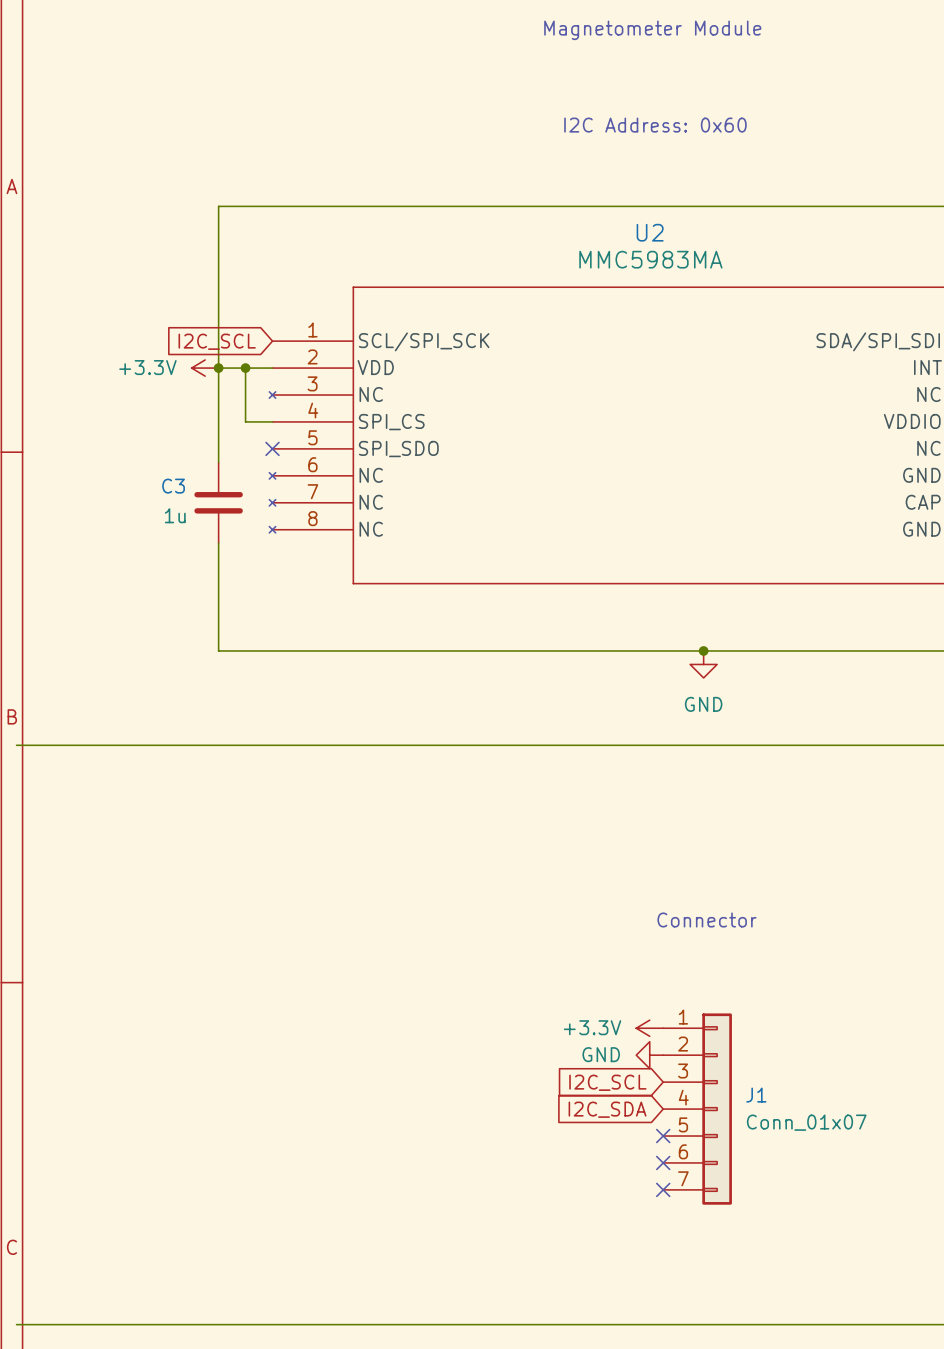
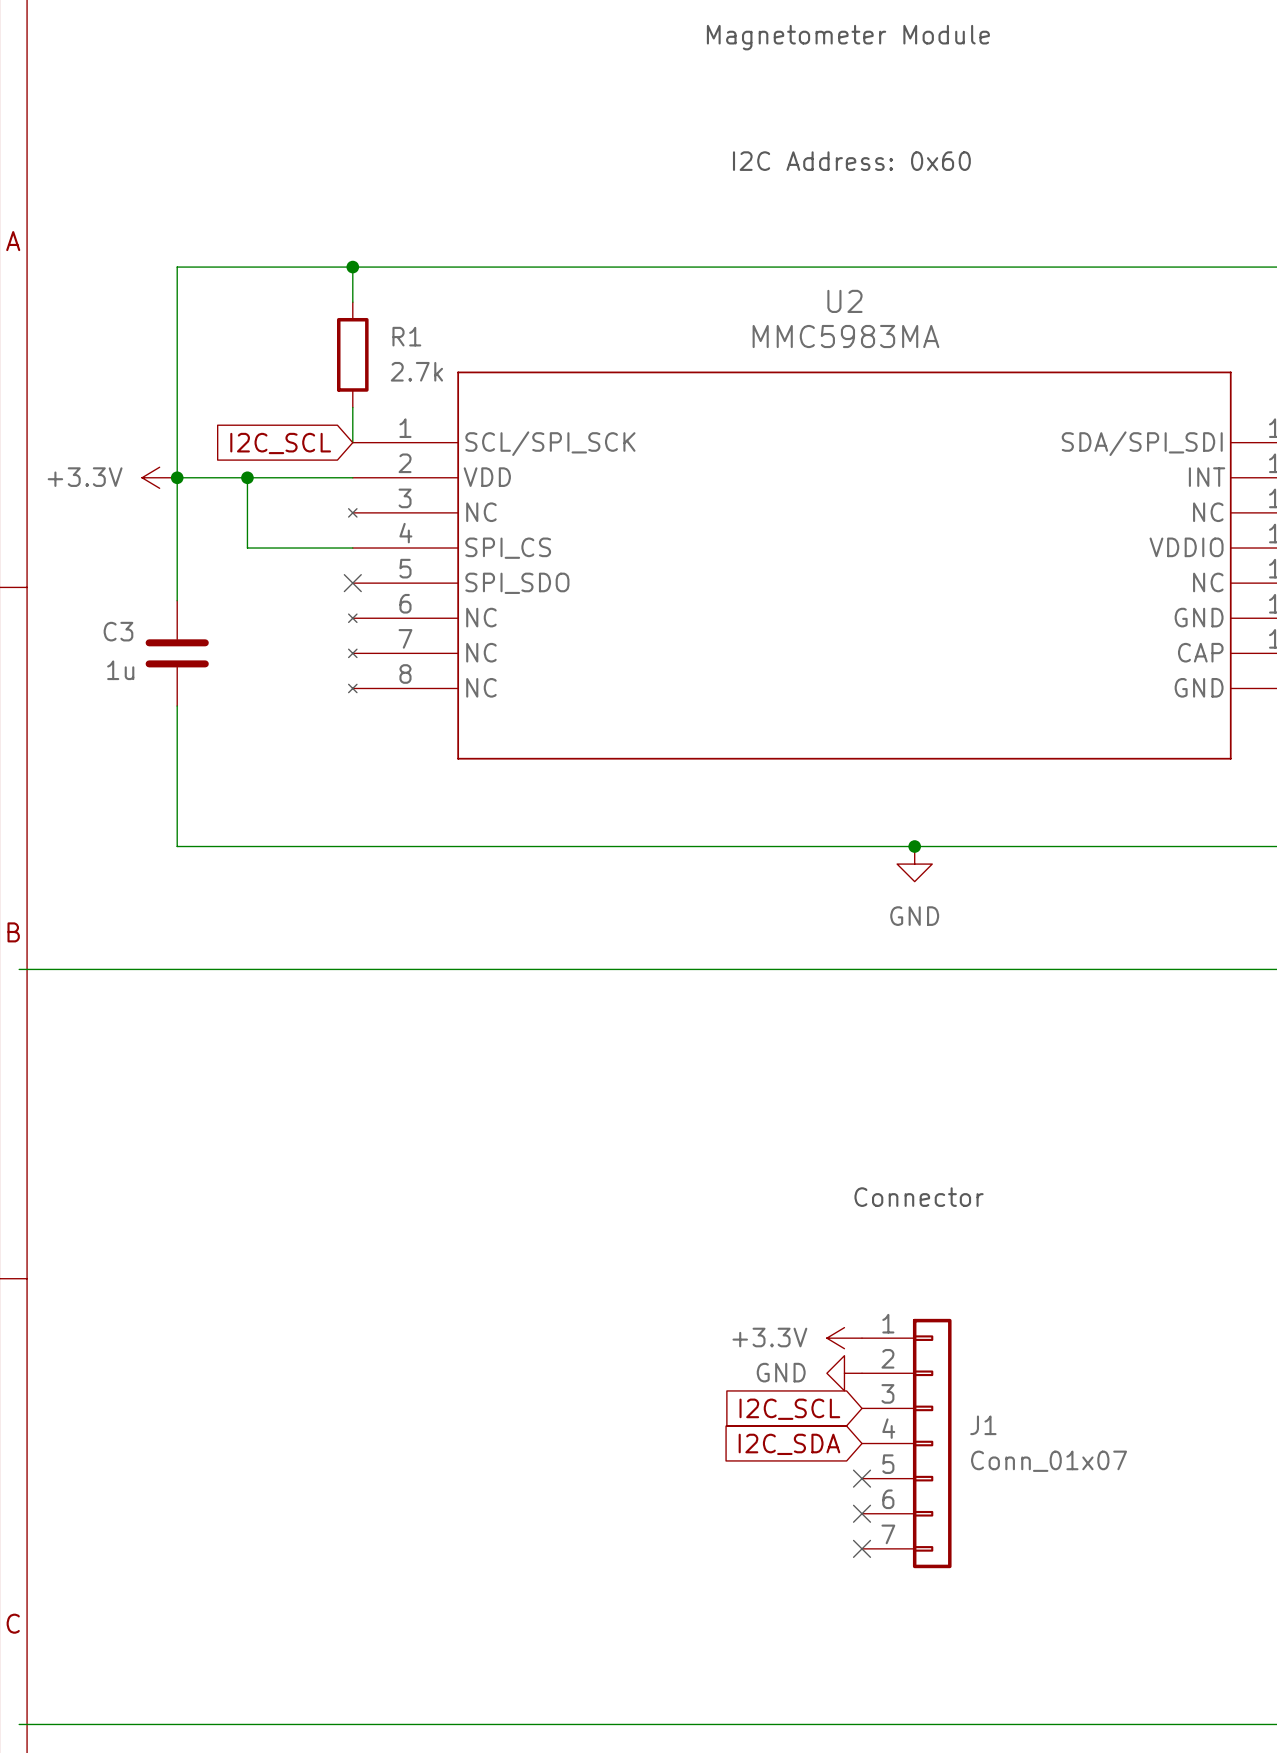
wire: (218, 206) (218, 462) -> (282, 267) (177, 267) (177, 600)
wire: none -> (352, 267) (352, 302)
junction: none -> (352, 267)
R1: none -> 2.7k (352, 354)
wire: none -> (352, 407) (352, 442)
wire: none -> (177, 477) (282, 477)
junction: none -> (177, 477)
junction: none -> (247, 477)
power symbol position: +3.3V (205, 368) -> +3.3V (159, 477)
junction: (218, 368) -> none
wire: (245, 368) (245, 421) -> (247, 477) (247, 548) (317, 548)
junction: (245, 368) -> none
C3 position: (218, 502) -> (177, 653)
wire: (218, 543) (218, 650) -> (177, 706) (177, 846) (282, 846)

